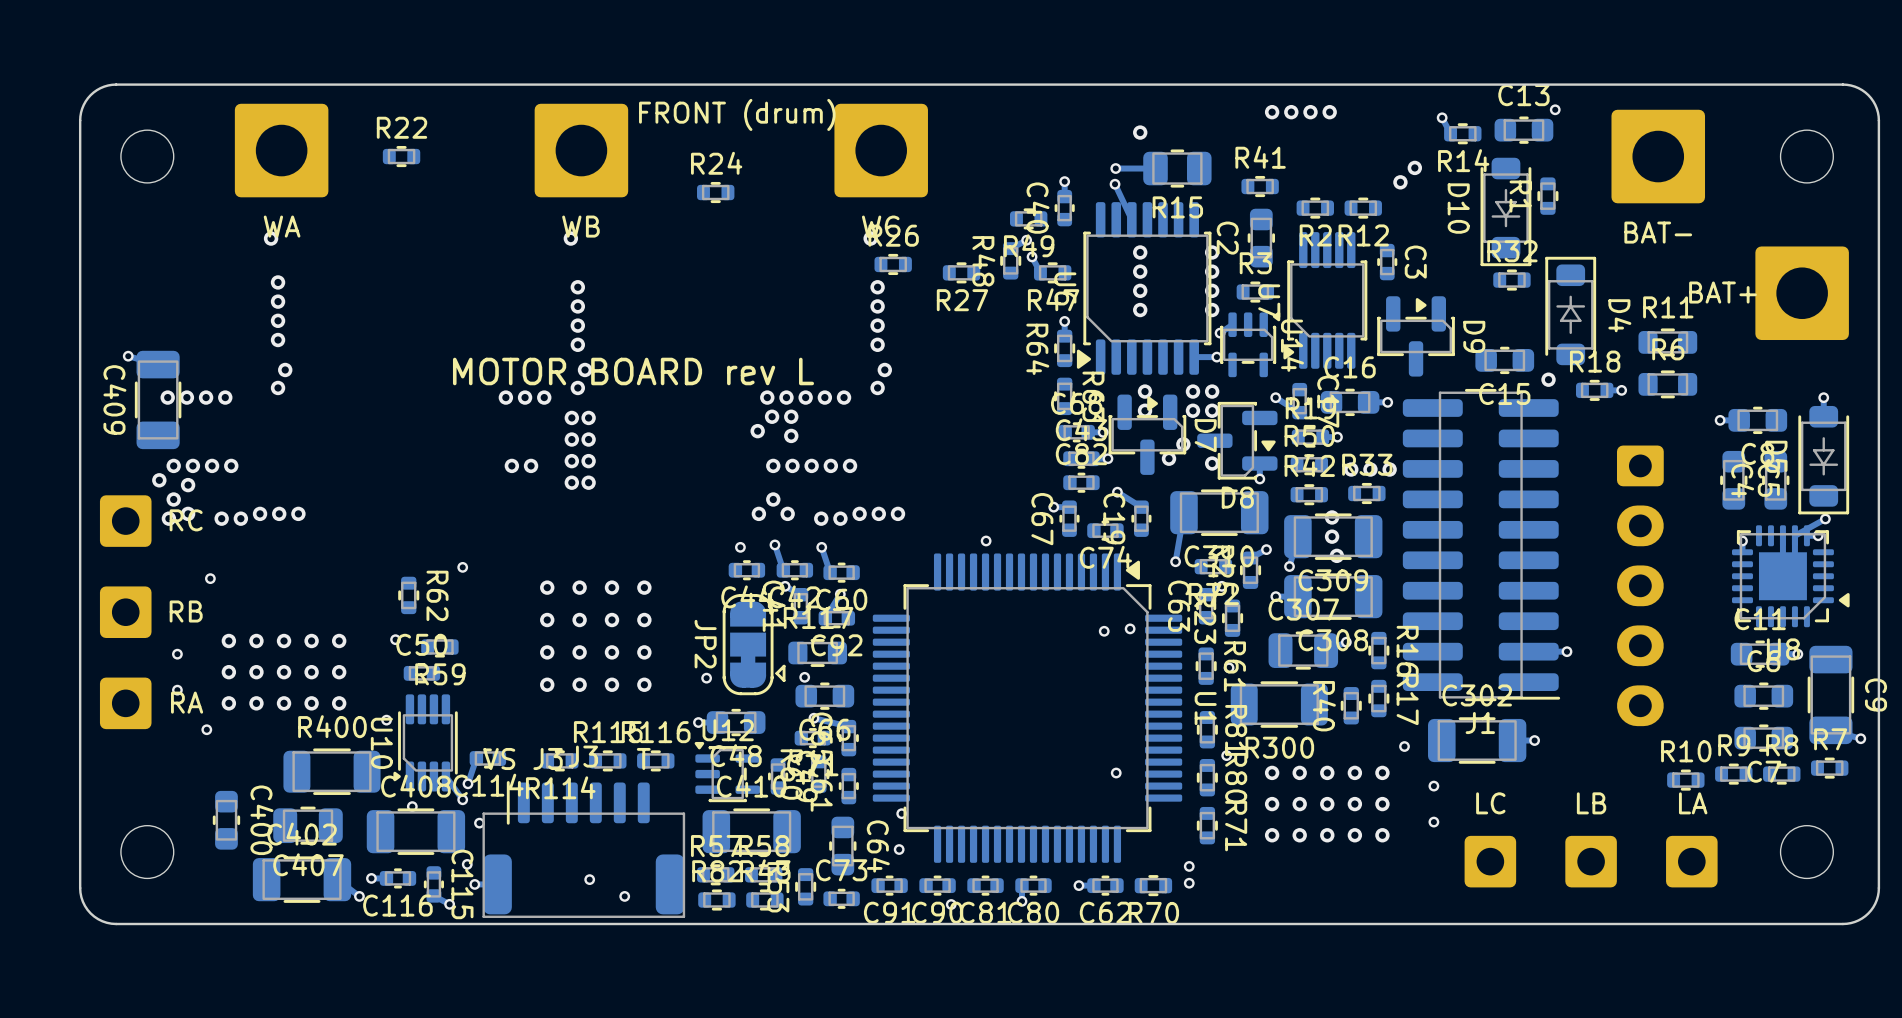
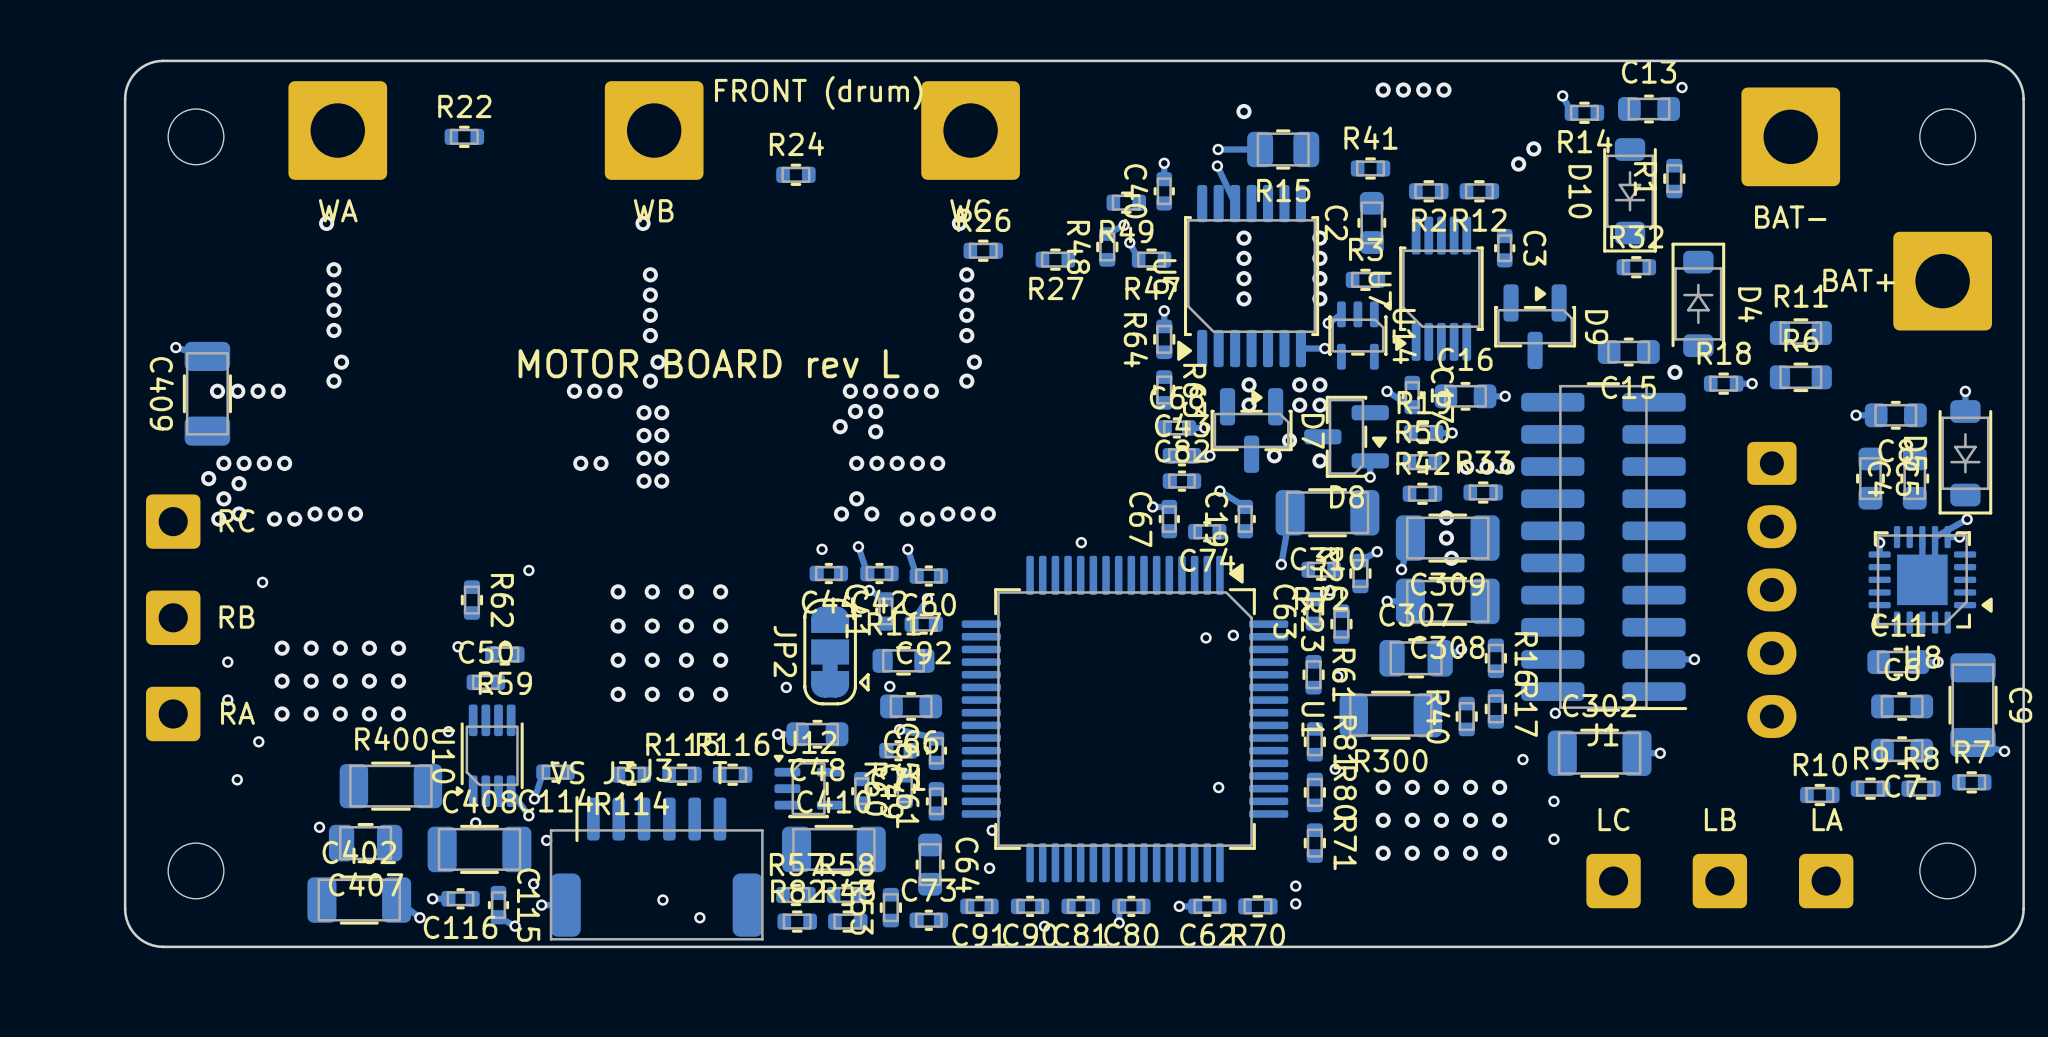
via: none -> (1555, 713)
via: none -> (237, 779)
via: none -> (319, 827)
C400: (226, 820) -> none

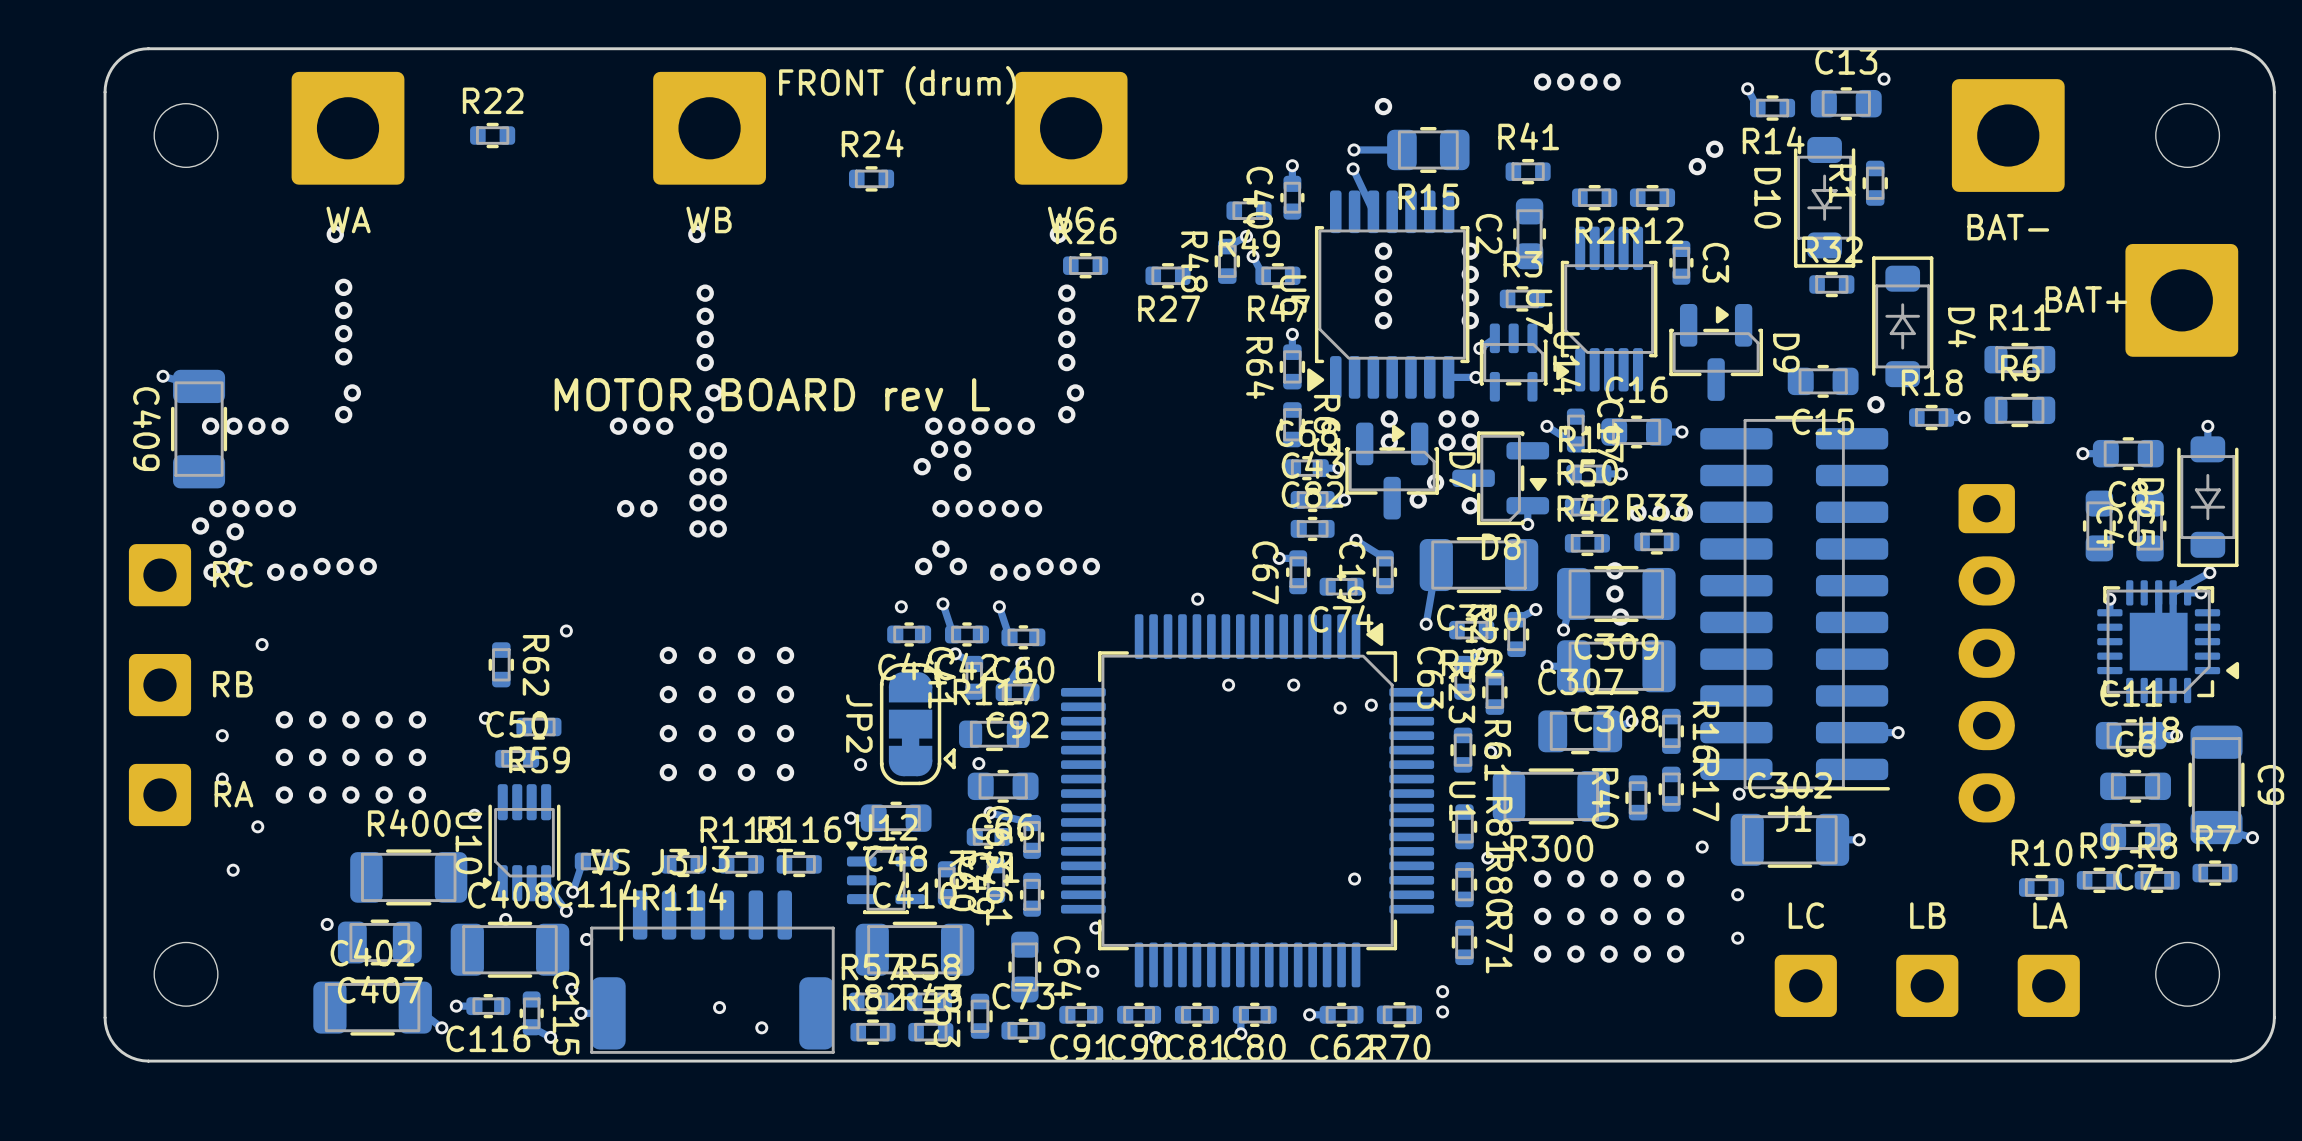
via: none -> (1228, 685)
via: none -> (1293, 685)

